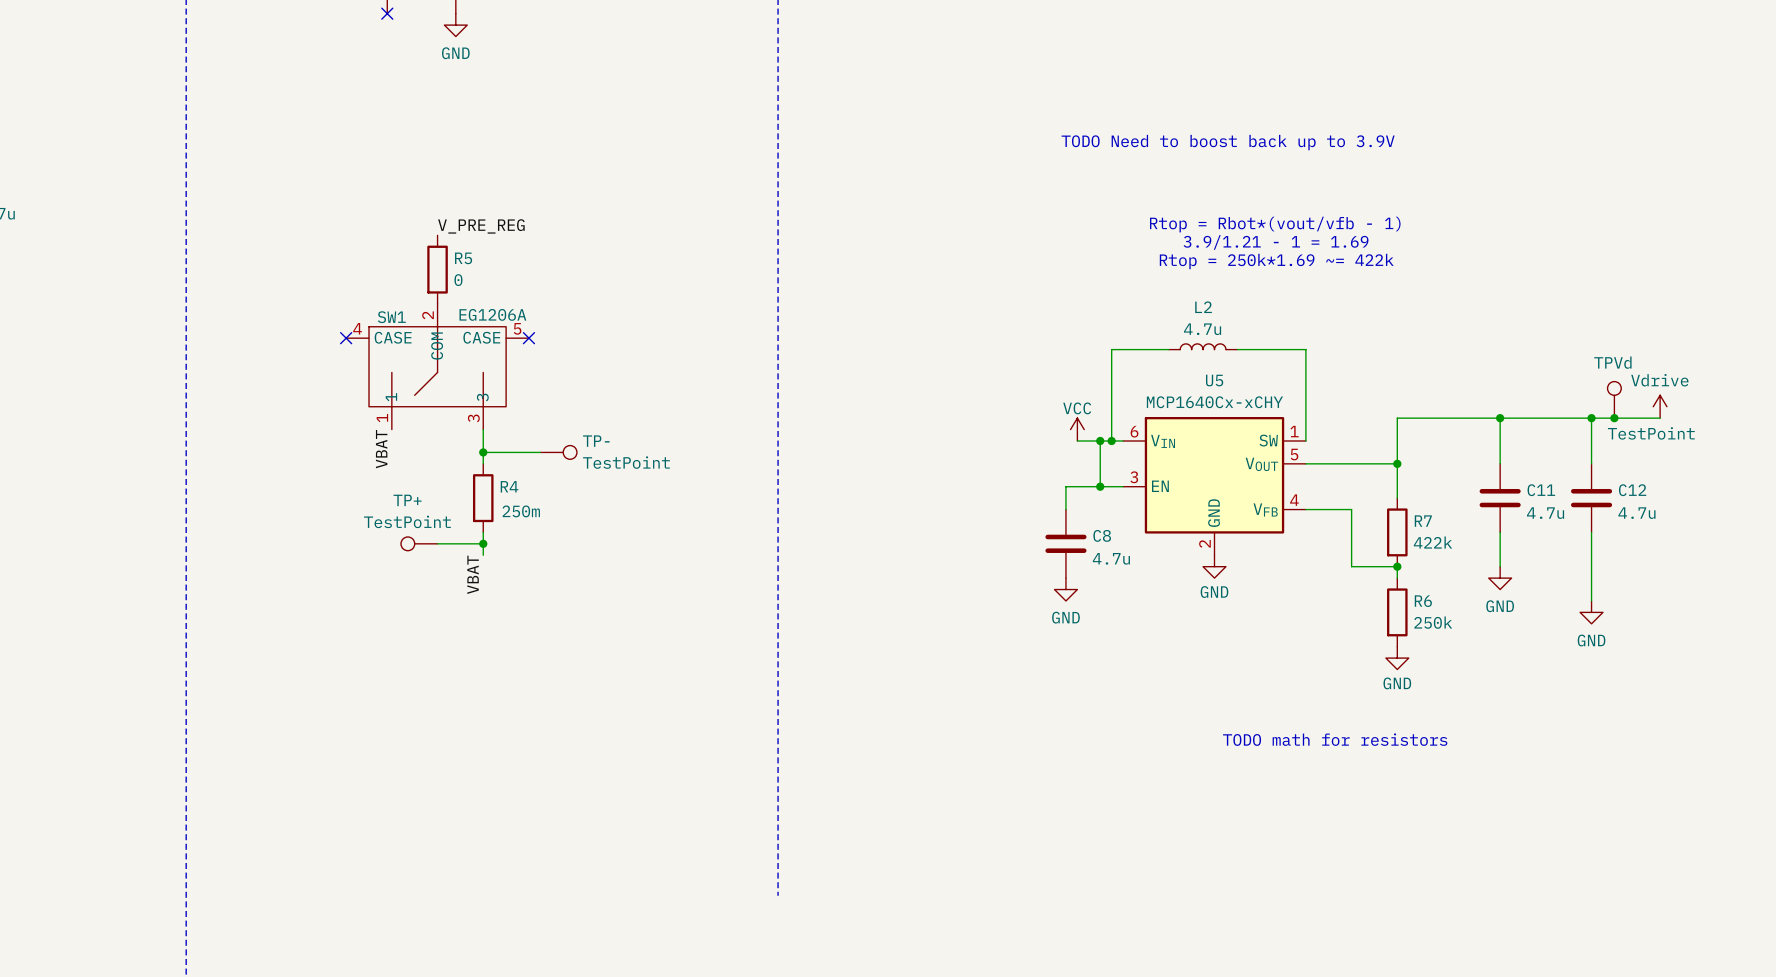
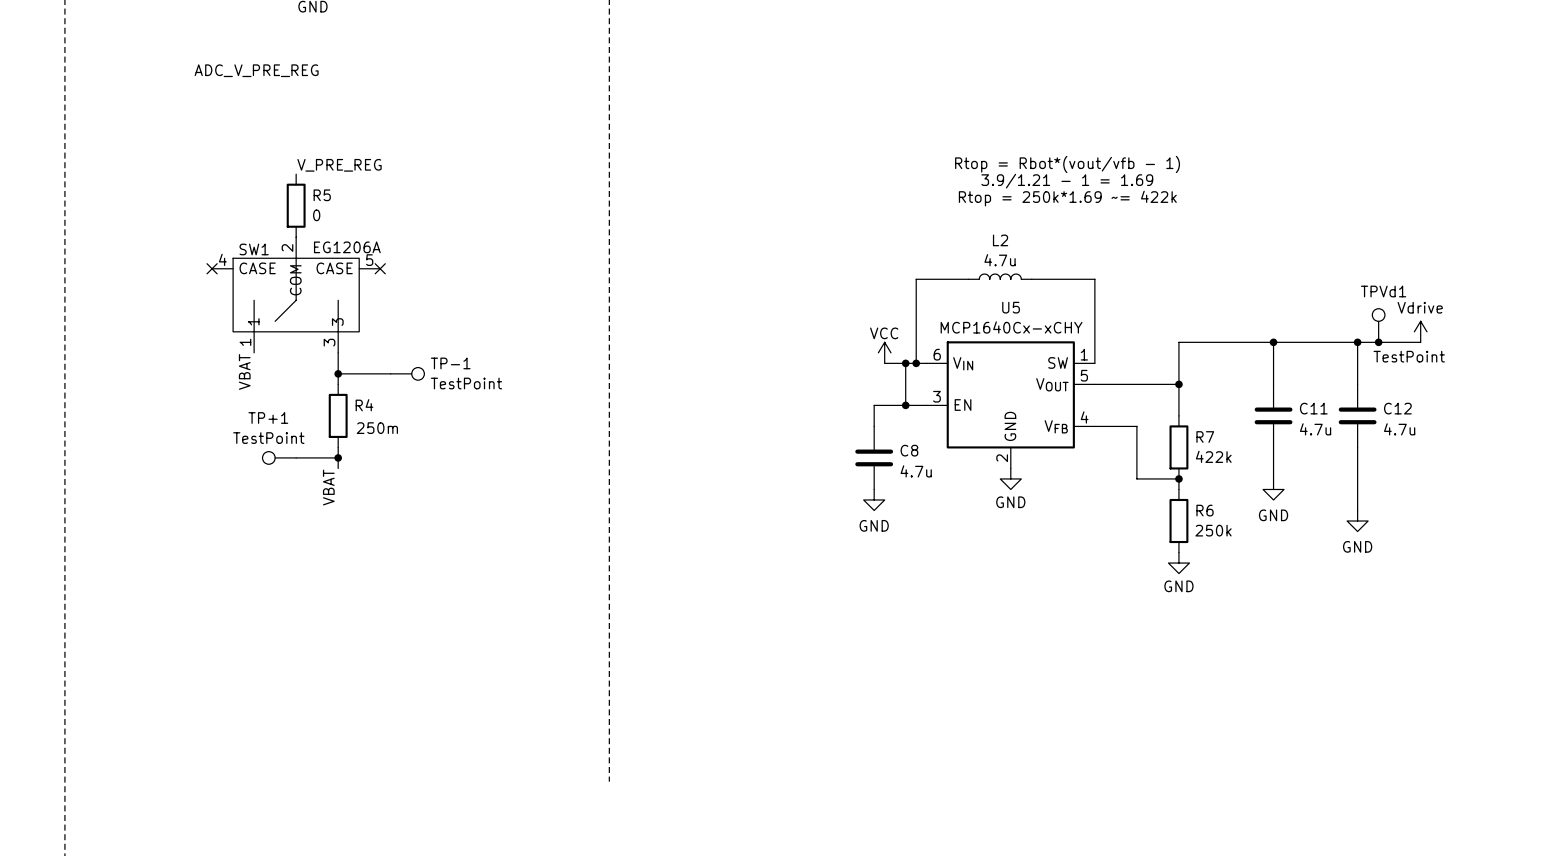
label: none -> ADC_ (213, 70)
label: none -> V_PRE_REG (276, 70)
text: TODO Need to boost back up to 3.9V (1228, 142) -> none
TPVd name: TPVd (1612, 362) -> TPVd1 (1383, 291)
TP- name: TP- (596, 441) -> TP-1 (450, 363)
TP+ name: TP+ (407, 500) -> TP+1 (268, 418)
text: TODO math for resistors (1335, 739) -> none

